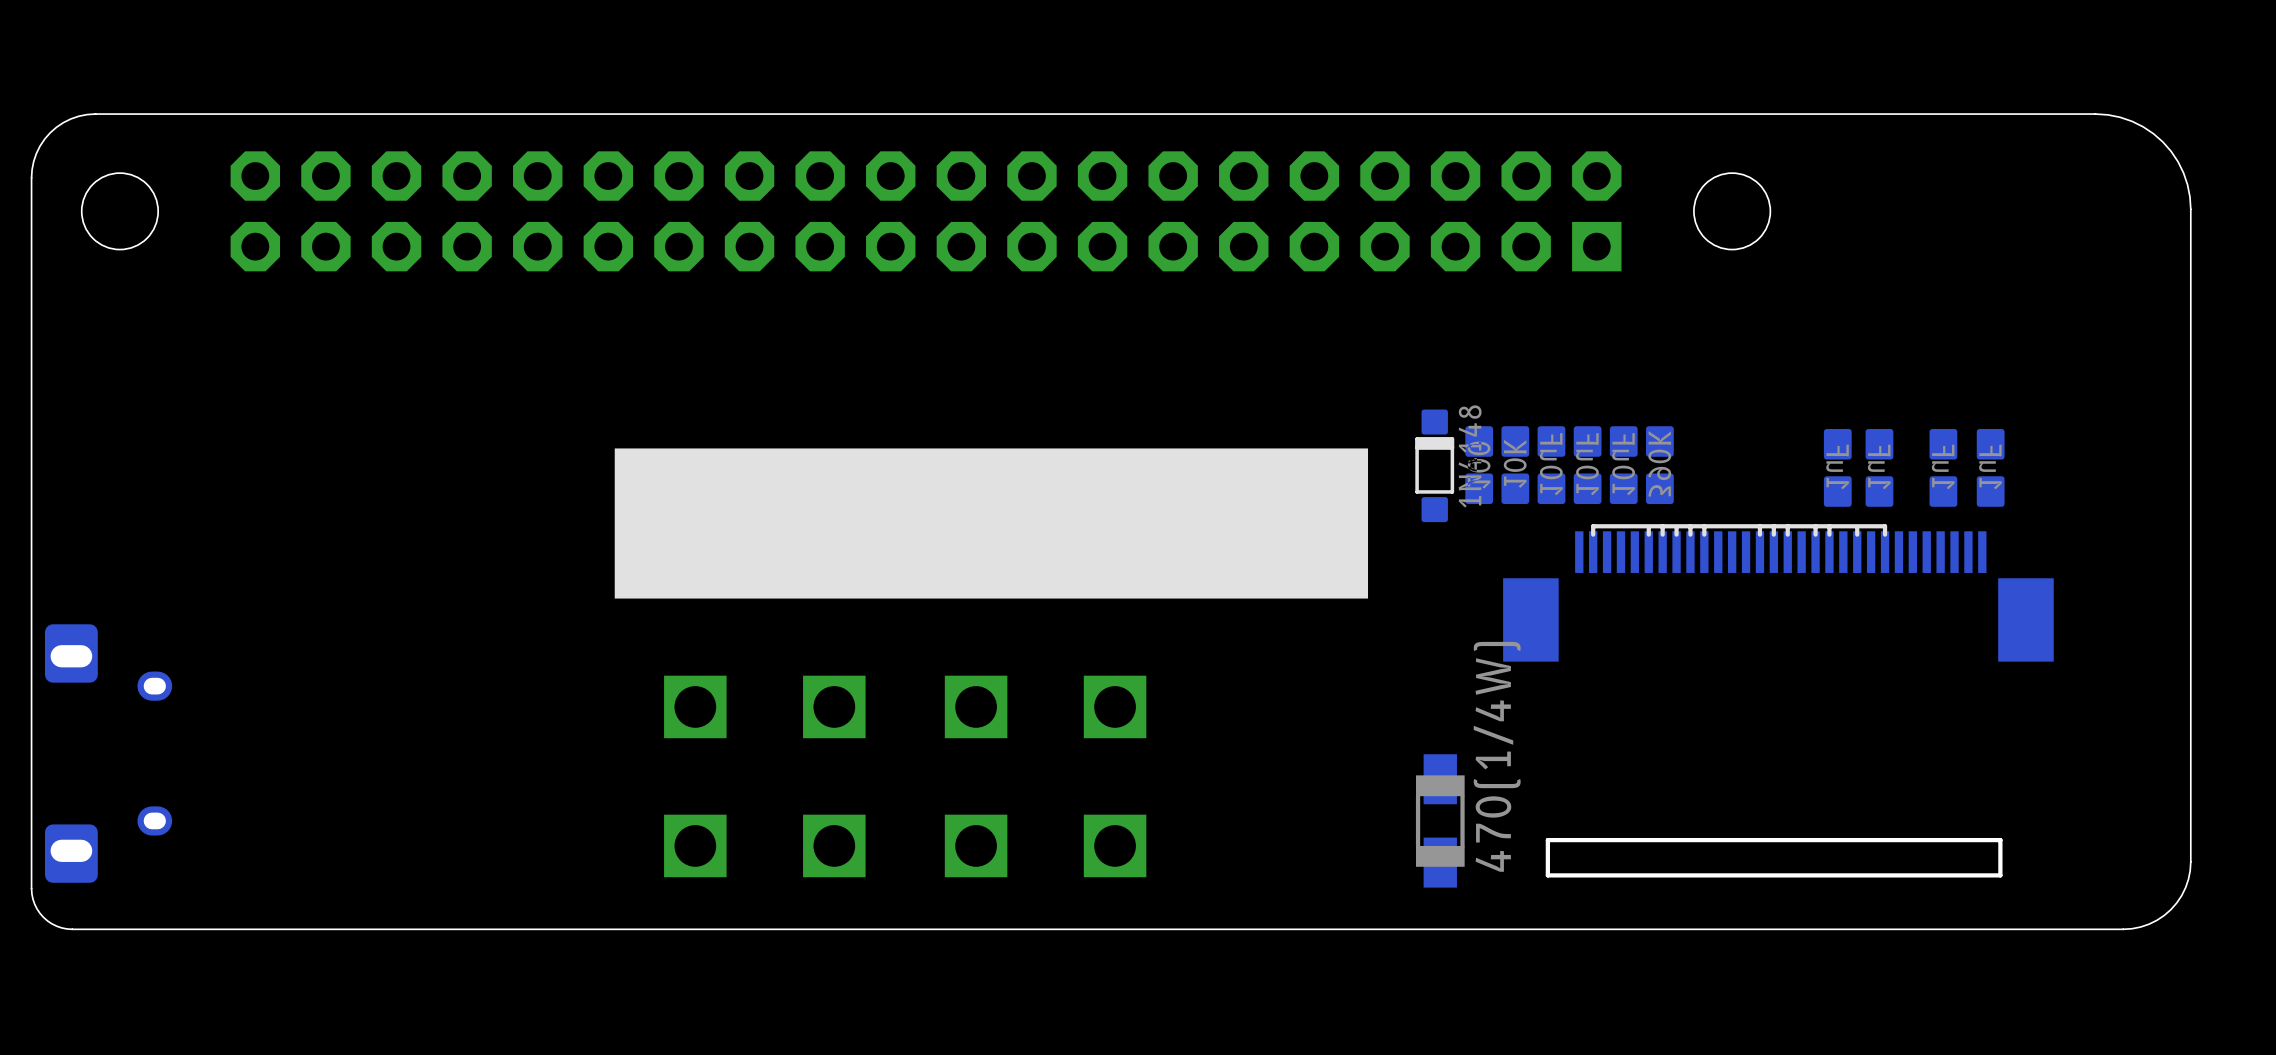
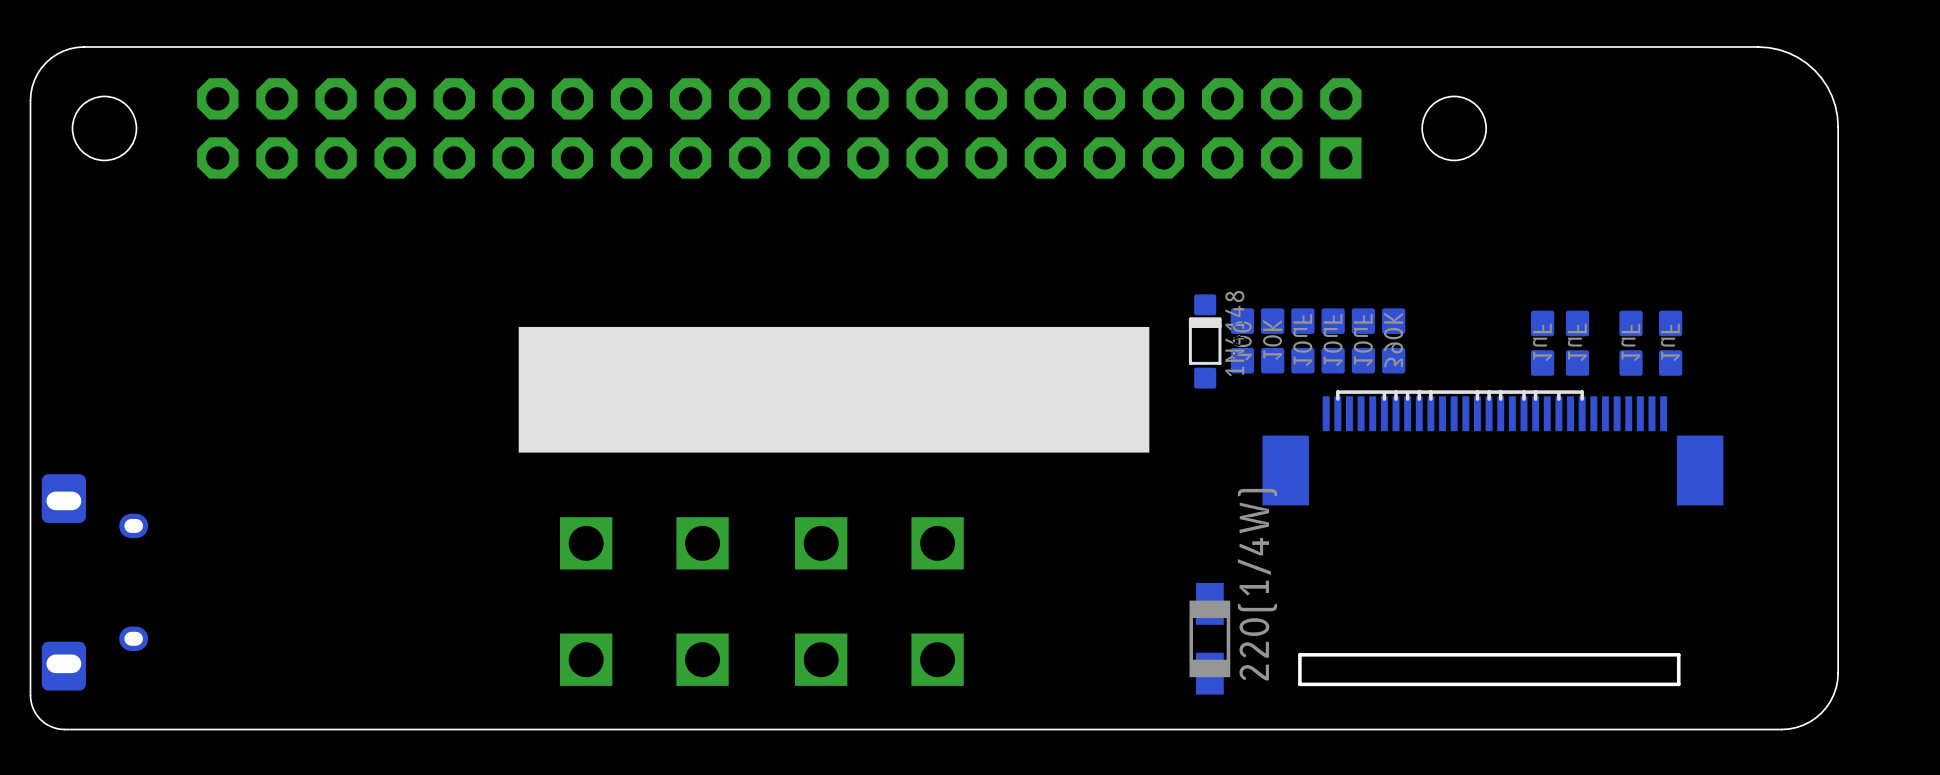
part value: 470(1/4W) (1497, 756) -> 220(1/4W) (1257, 584)

